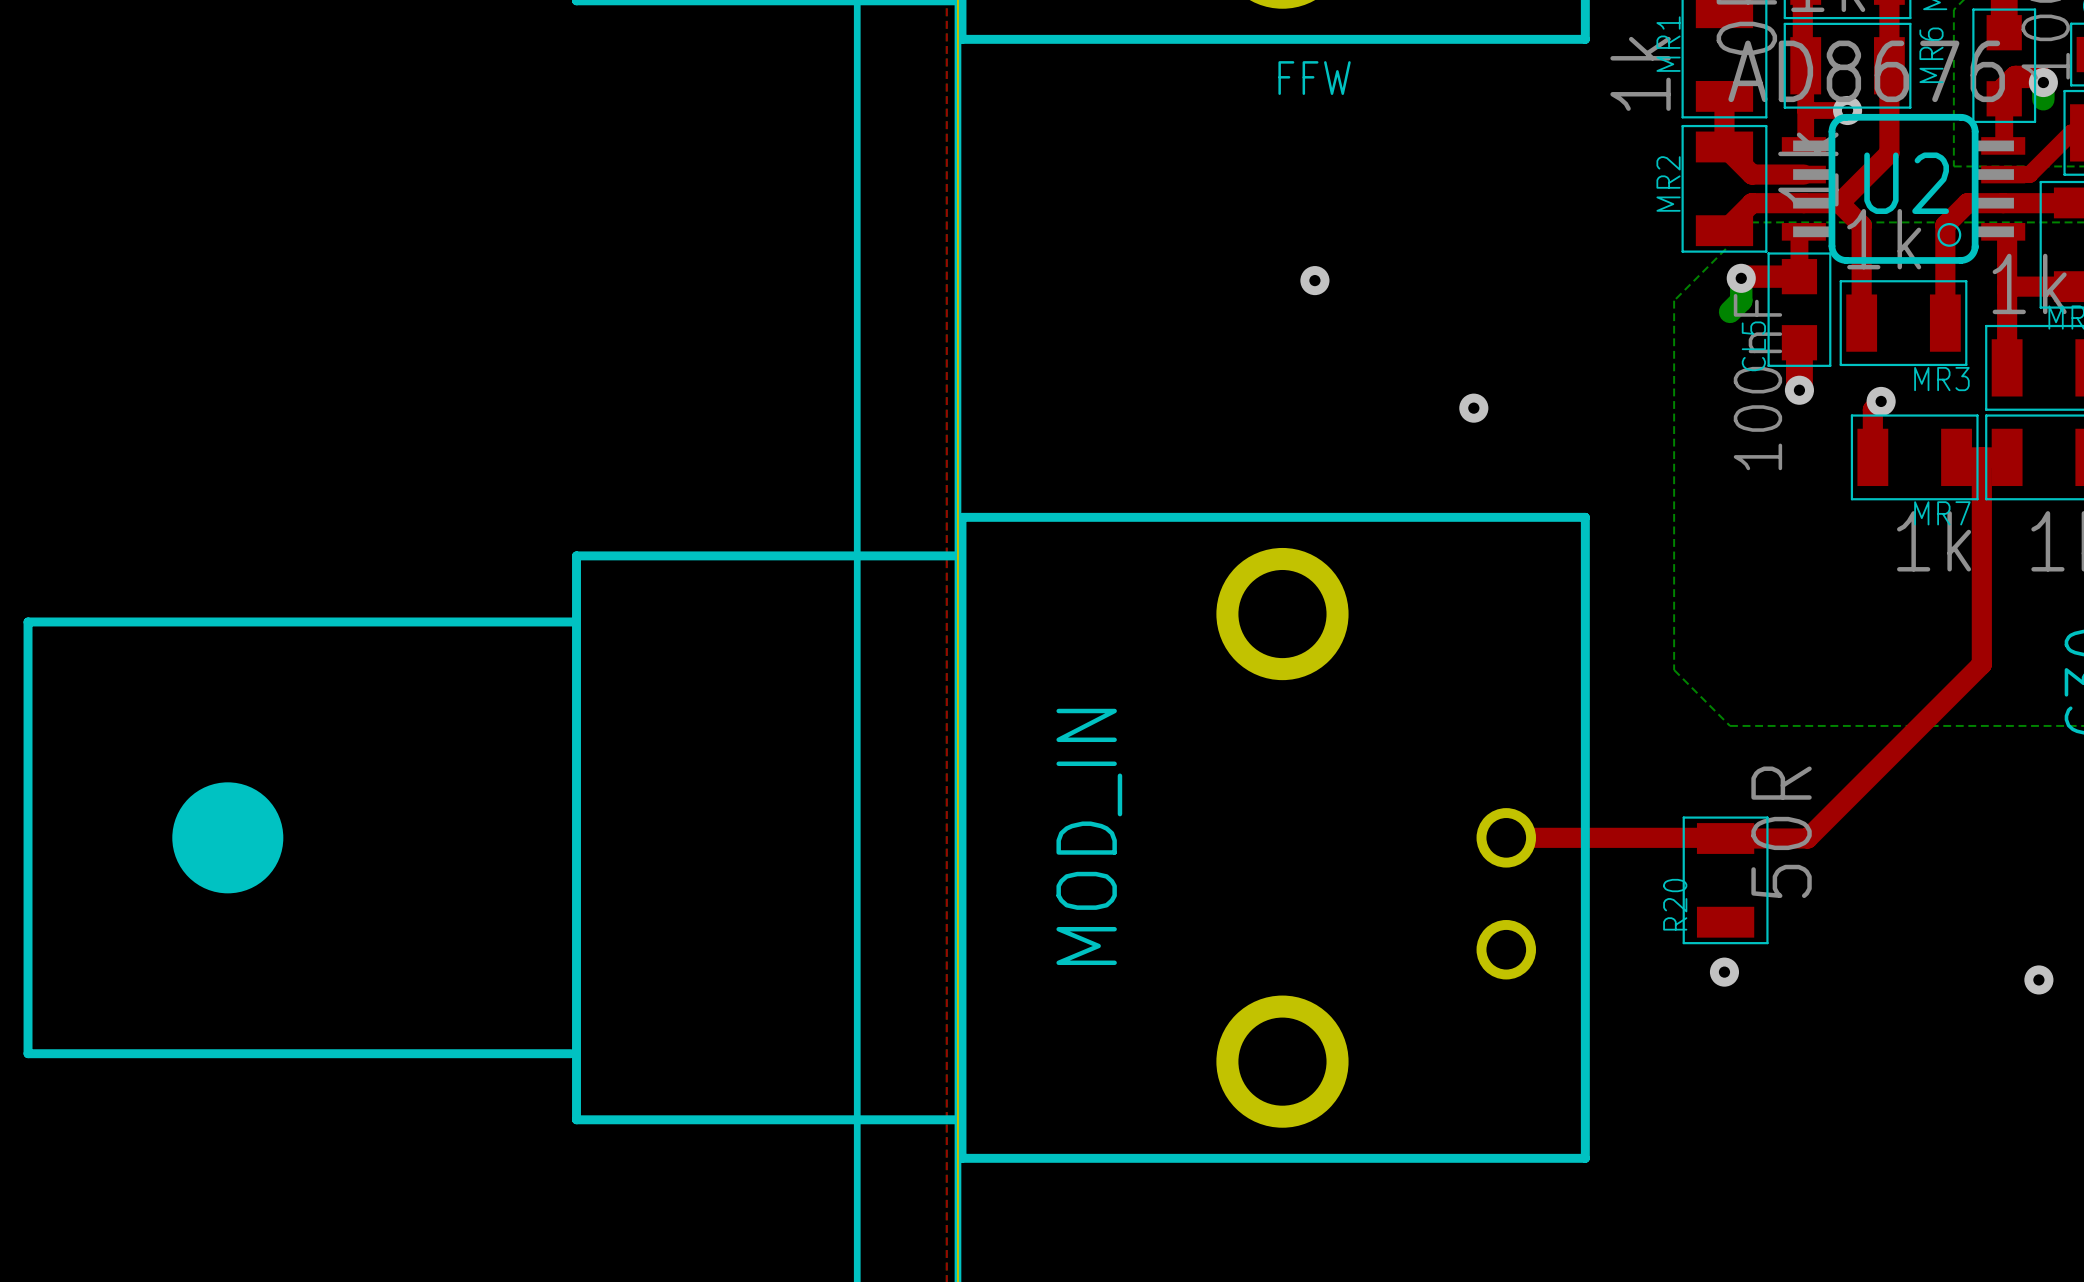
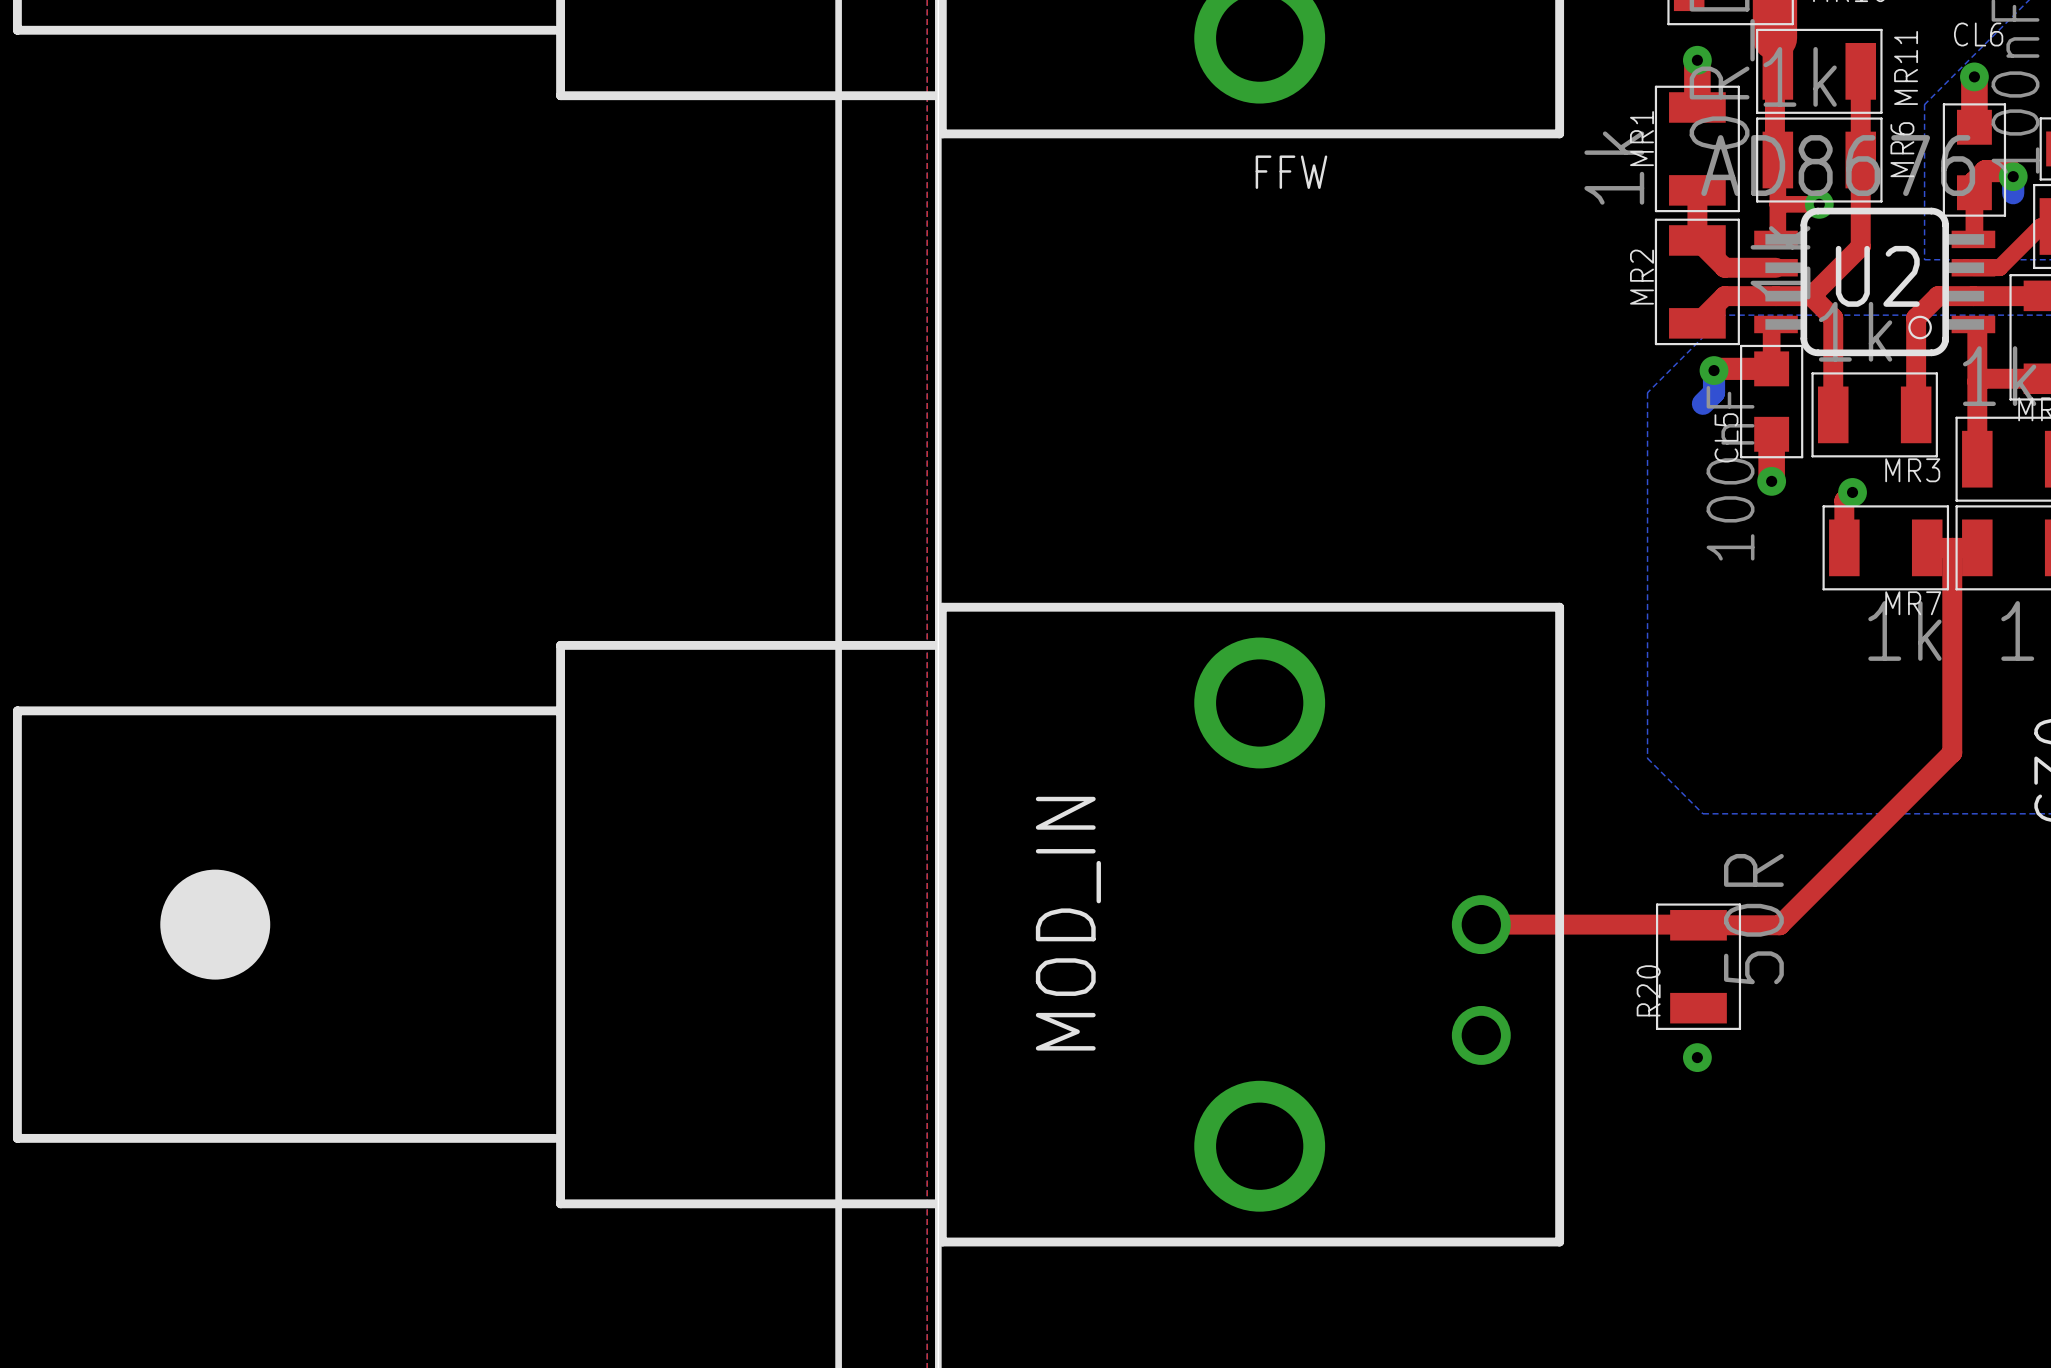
via: (1314, 280) -> none
via: (1473, 408) -> none
via: (2038, 979) -> none

